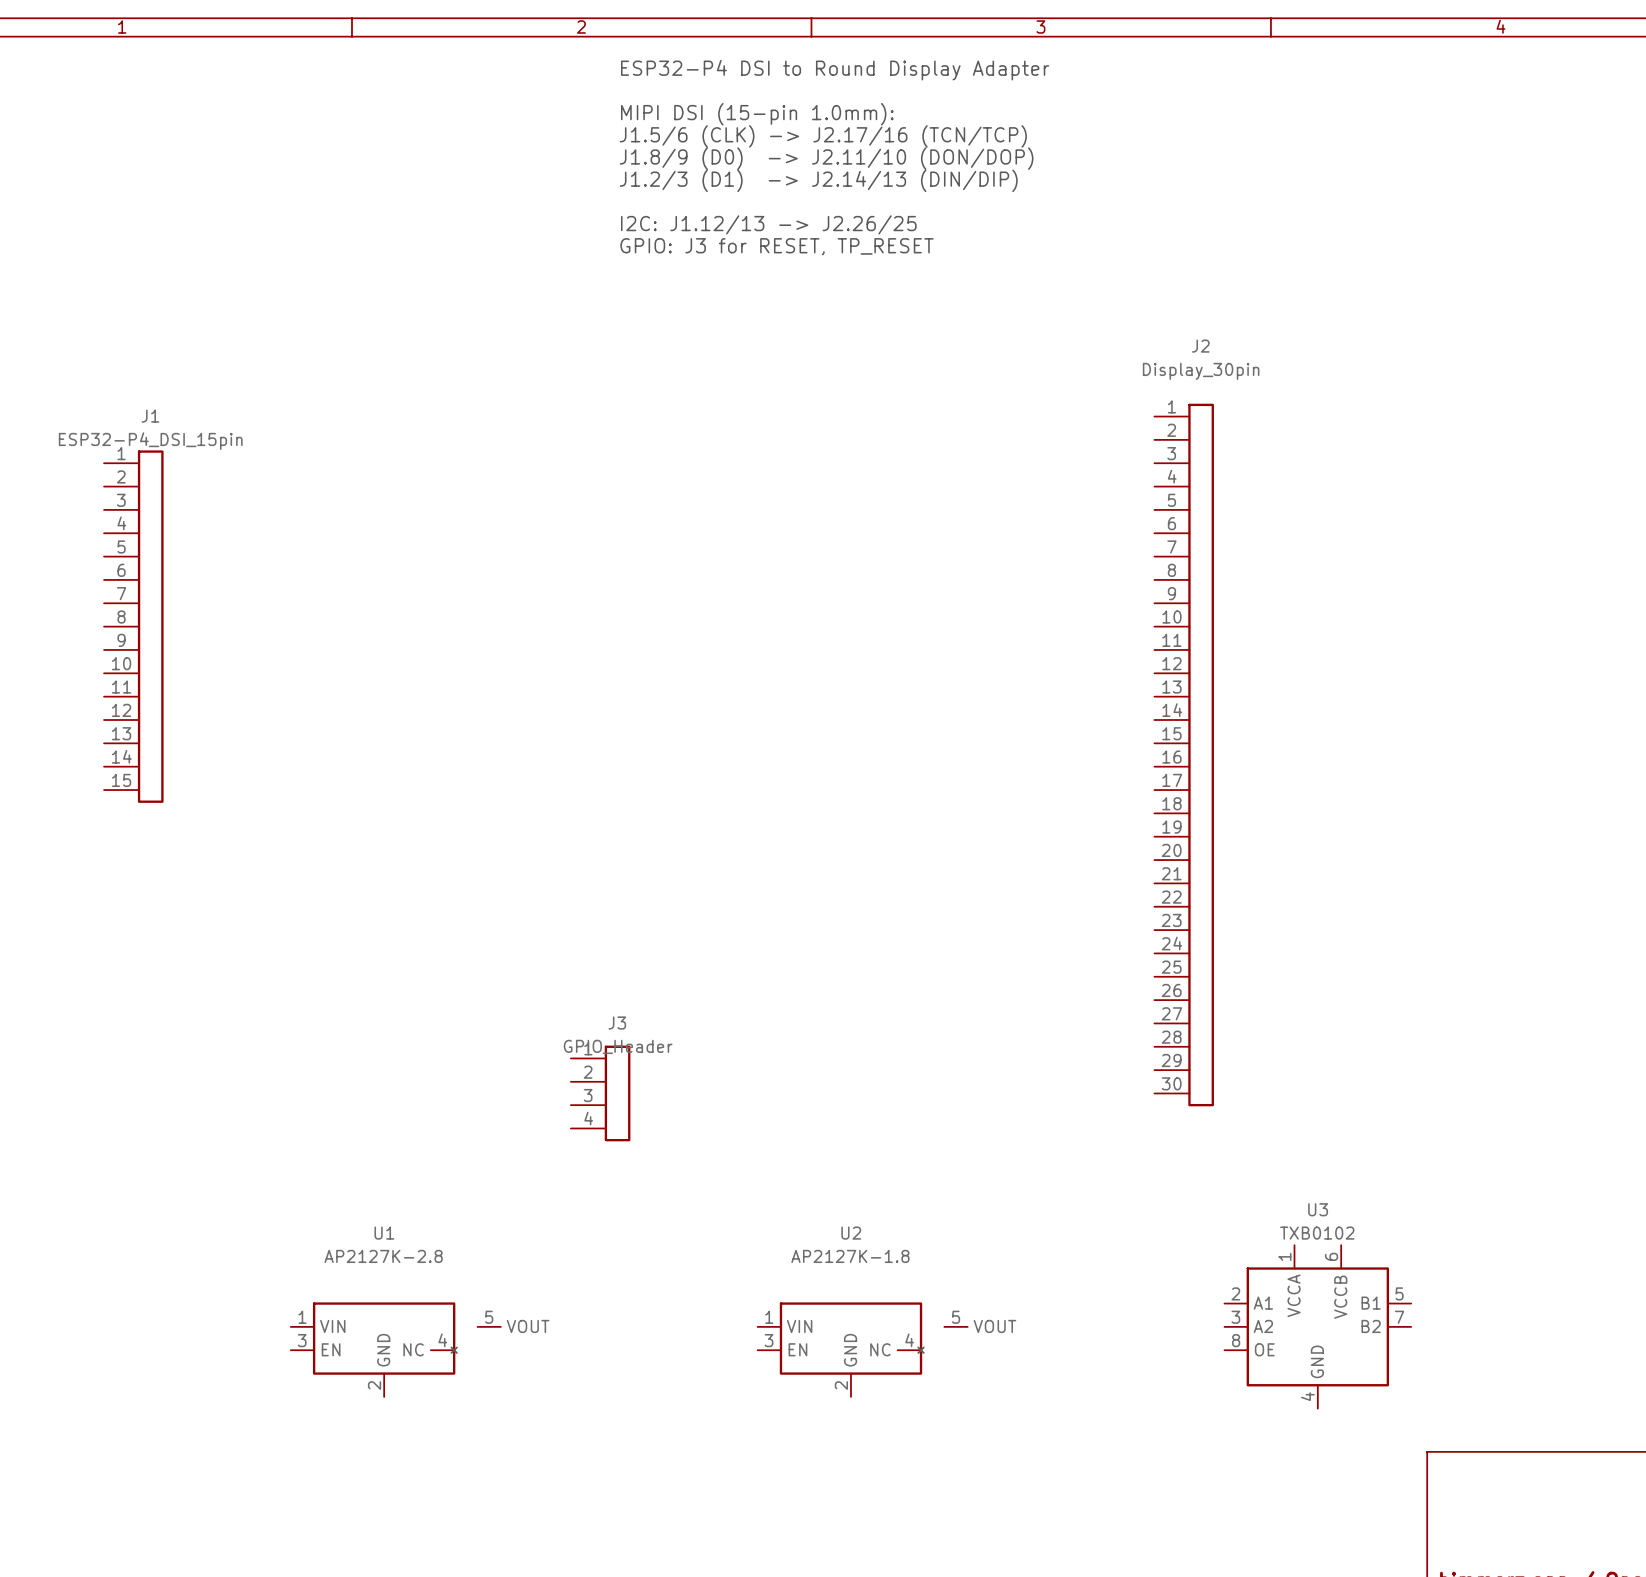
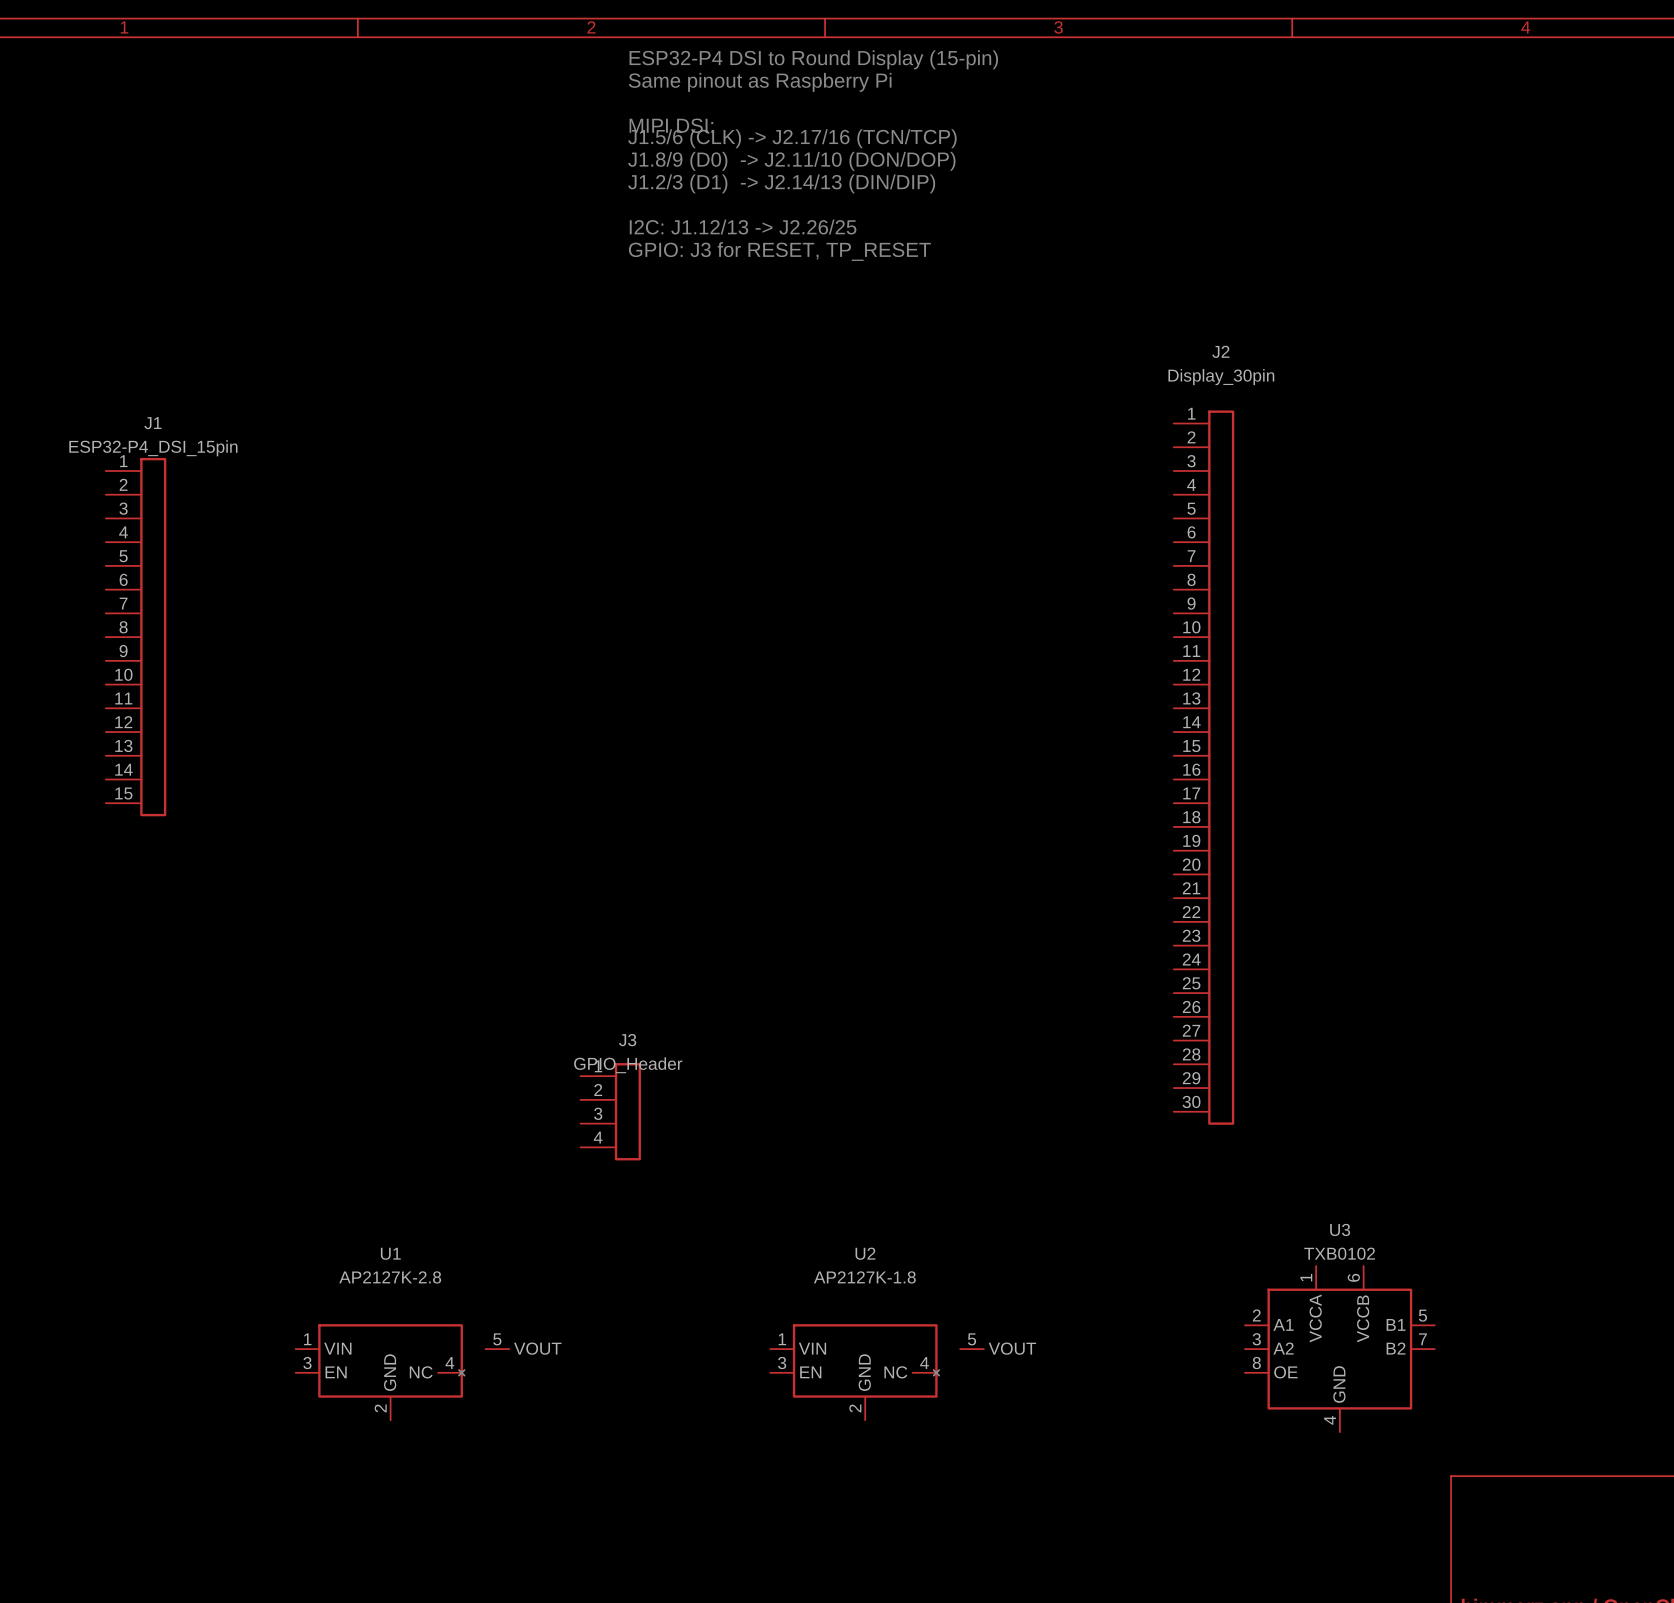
text: ESP32-P4 DSI to Round Display Adapter (835, 70) -> ESP32-P4 DSI to Round Display (15-pin) (813, 59)
text: none -> Same pinout as Raspberry Pi (760, 82)
text: MIPI DSI (15-pin 1.0mm): (757, 114) -> none
text: none -> MIPI DSI: (671, 125)

